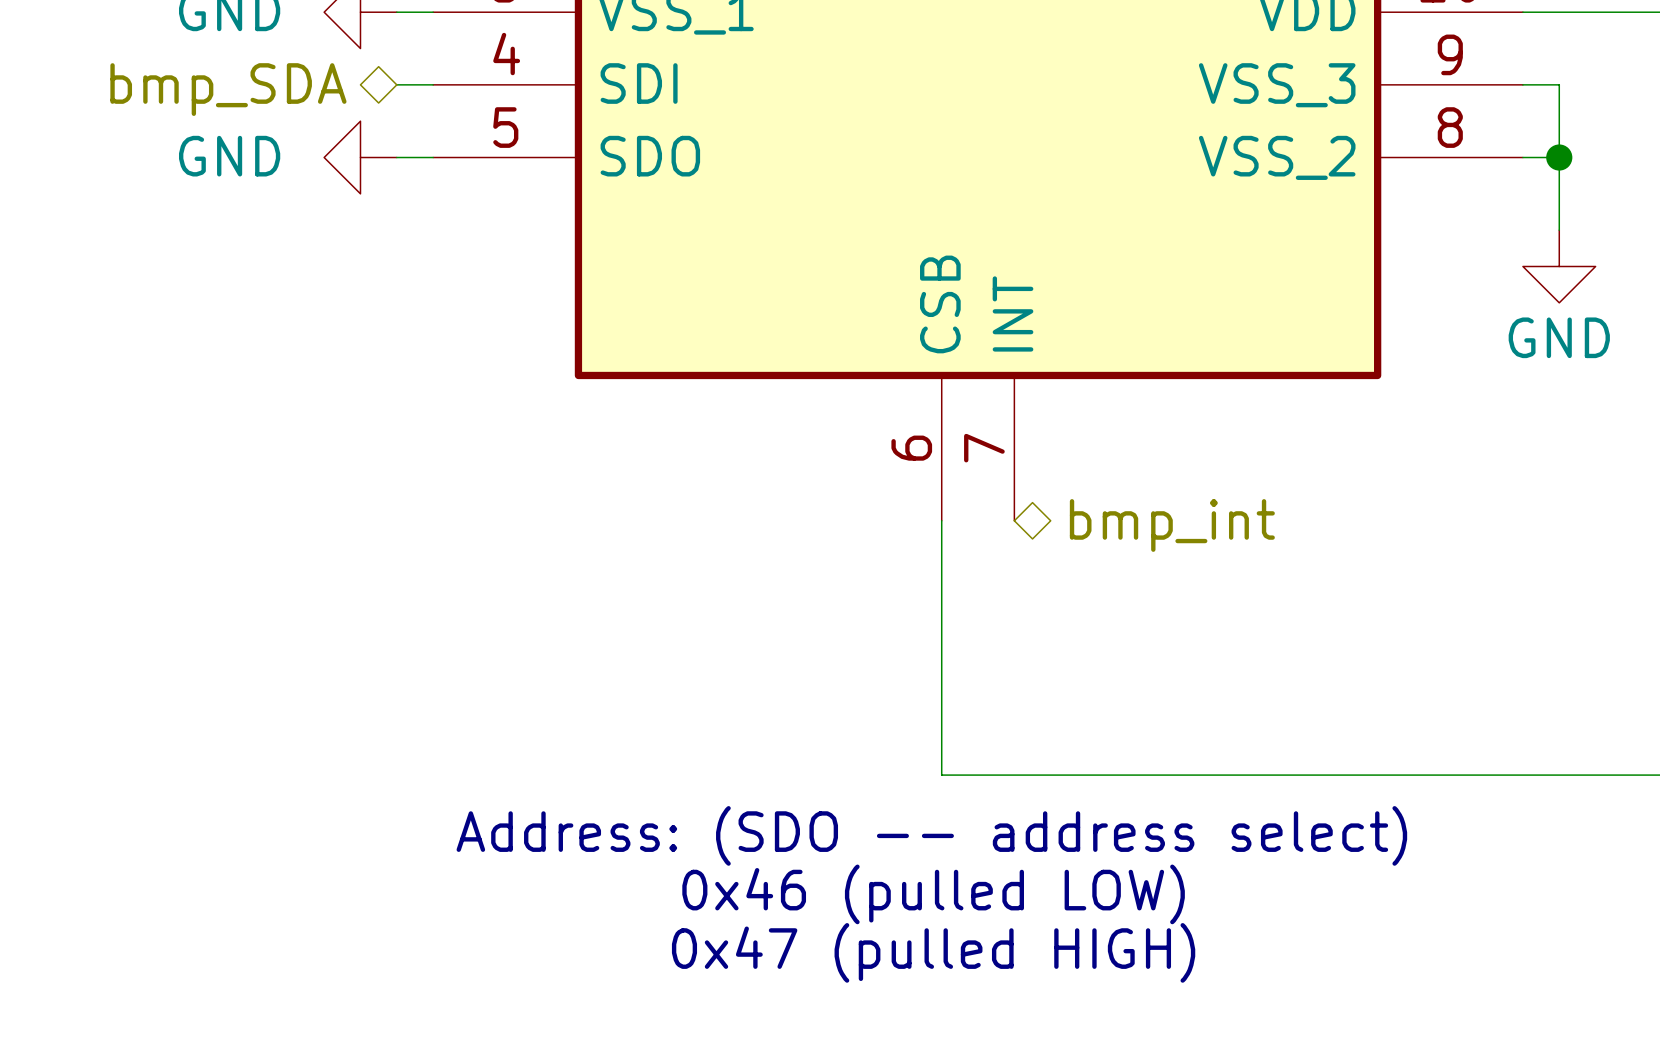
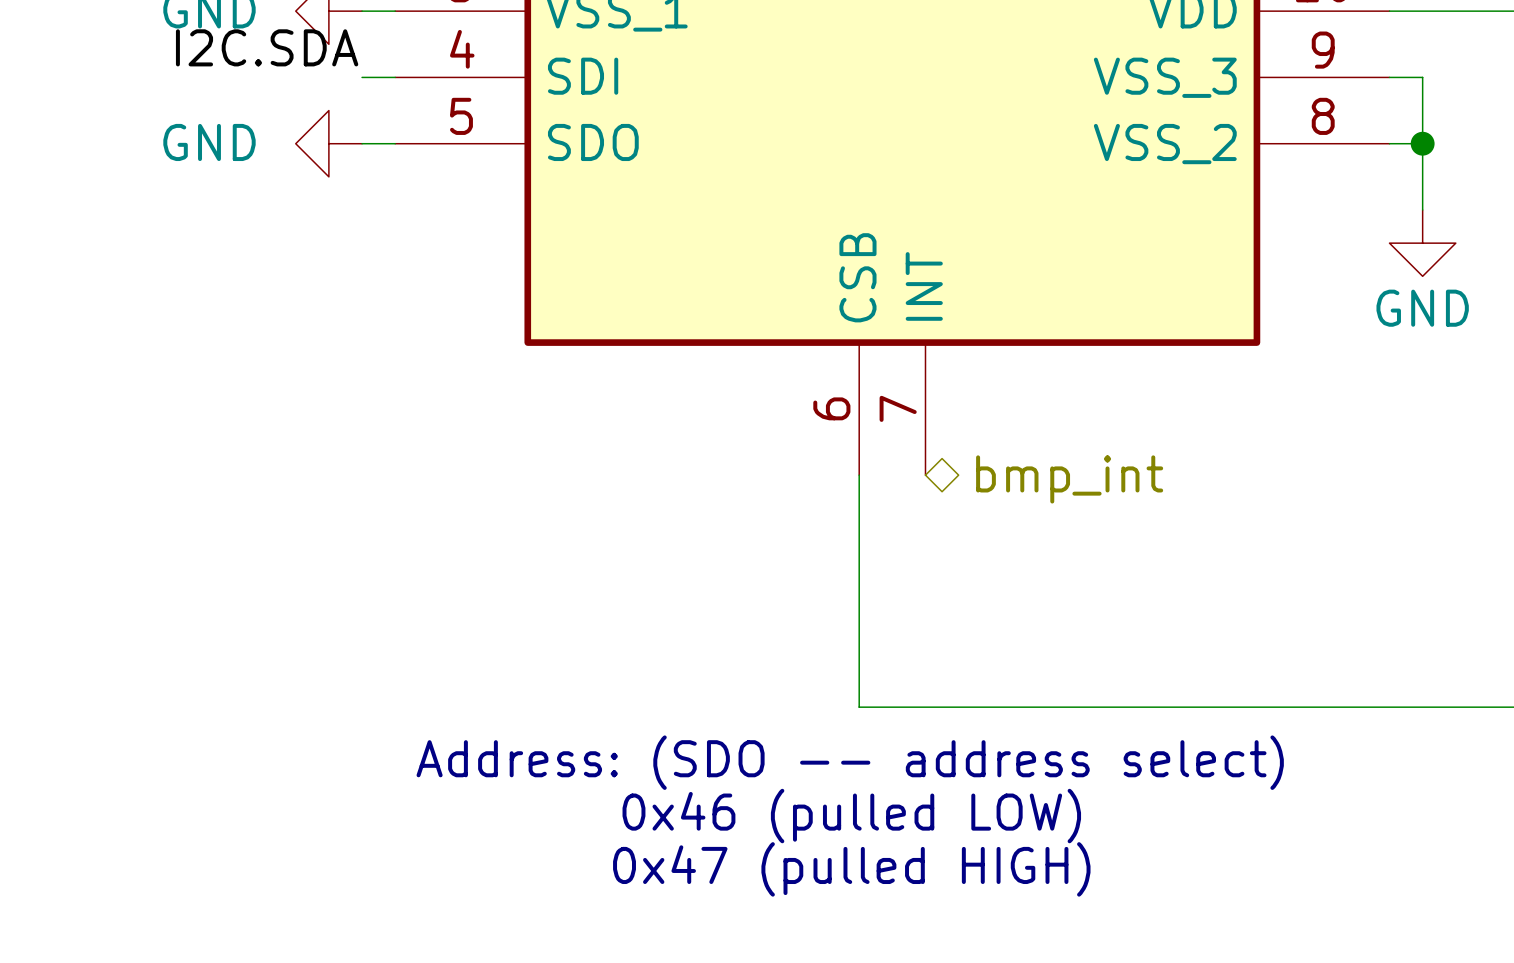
label: none -> I2C.SDA (267, 47)
hierarchical label: bmp_SDA (228, 89) -> none

